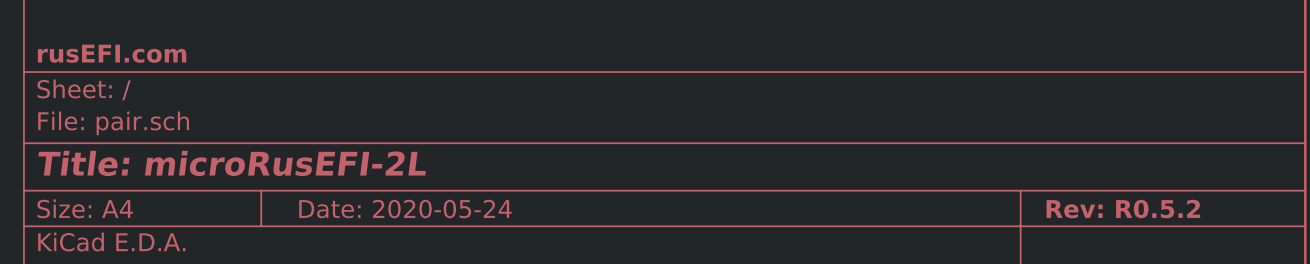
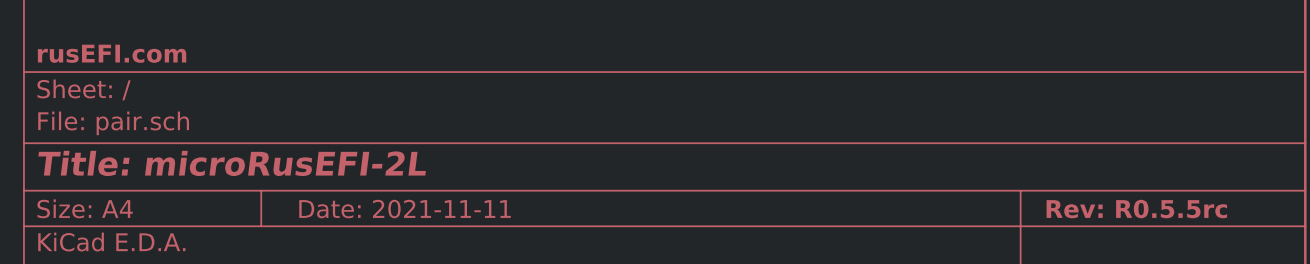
title block: Date: 2020-05-24 (405, 209) -> Date: 2021-11-11 (405, 209)
title block: Rev: R0.5.2 (1123, 209) -> Rev: R0.5.5rc (1136, 209)

